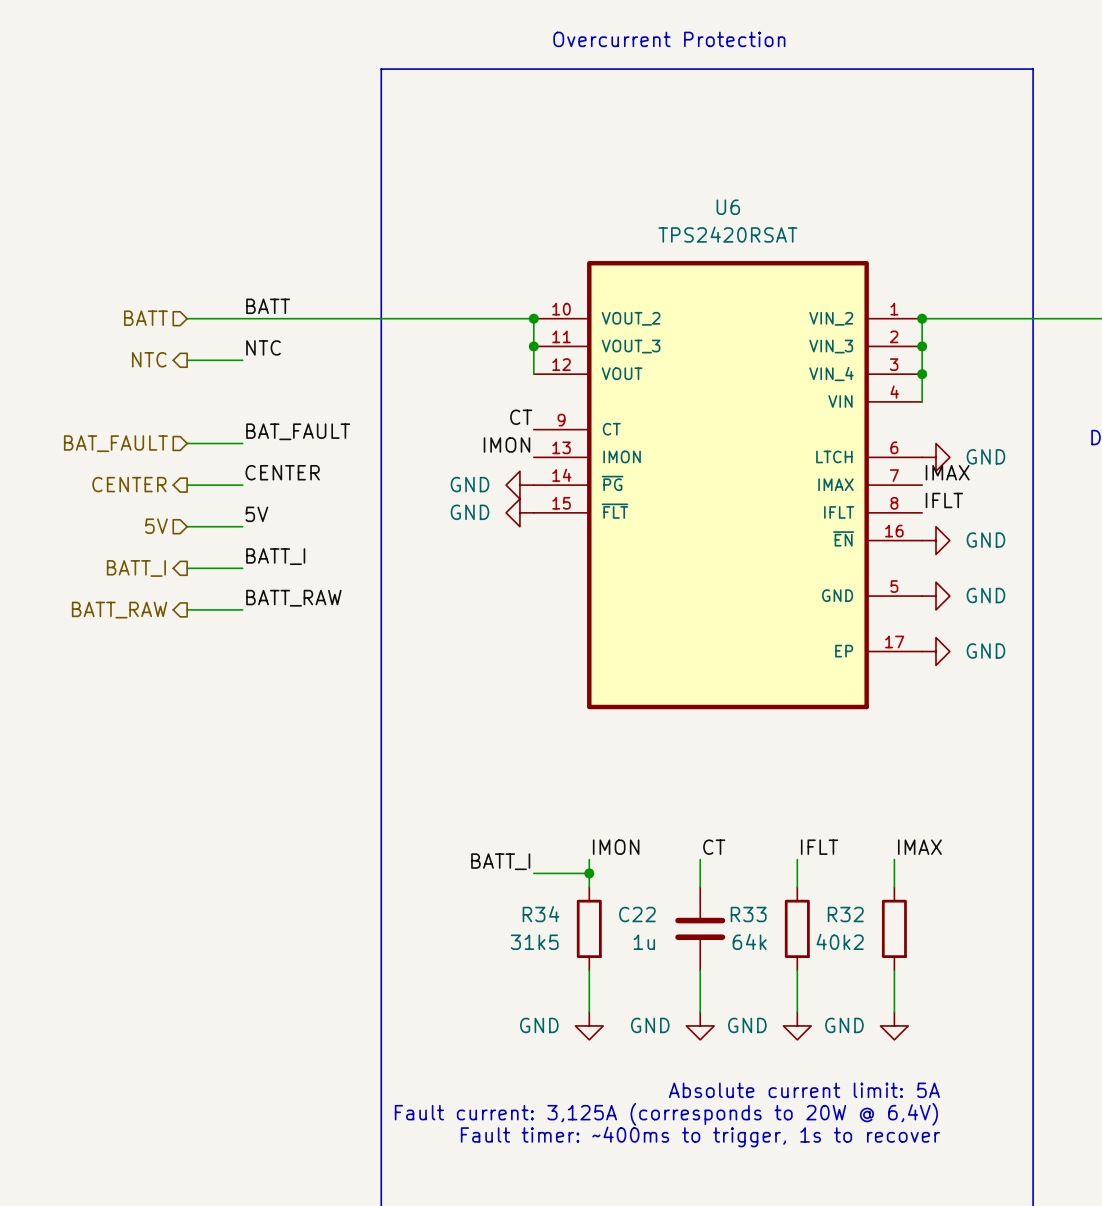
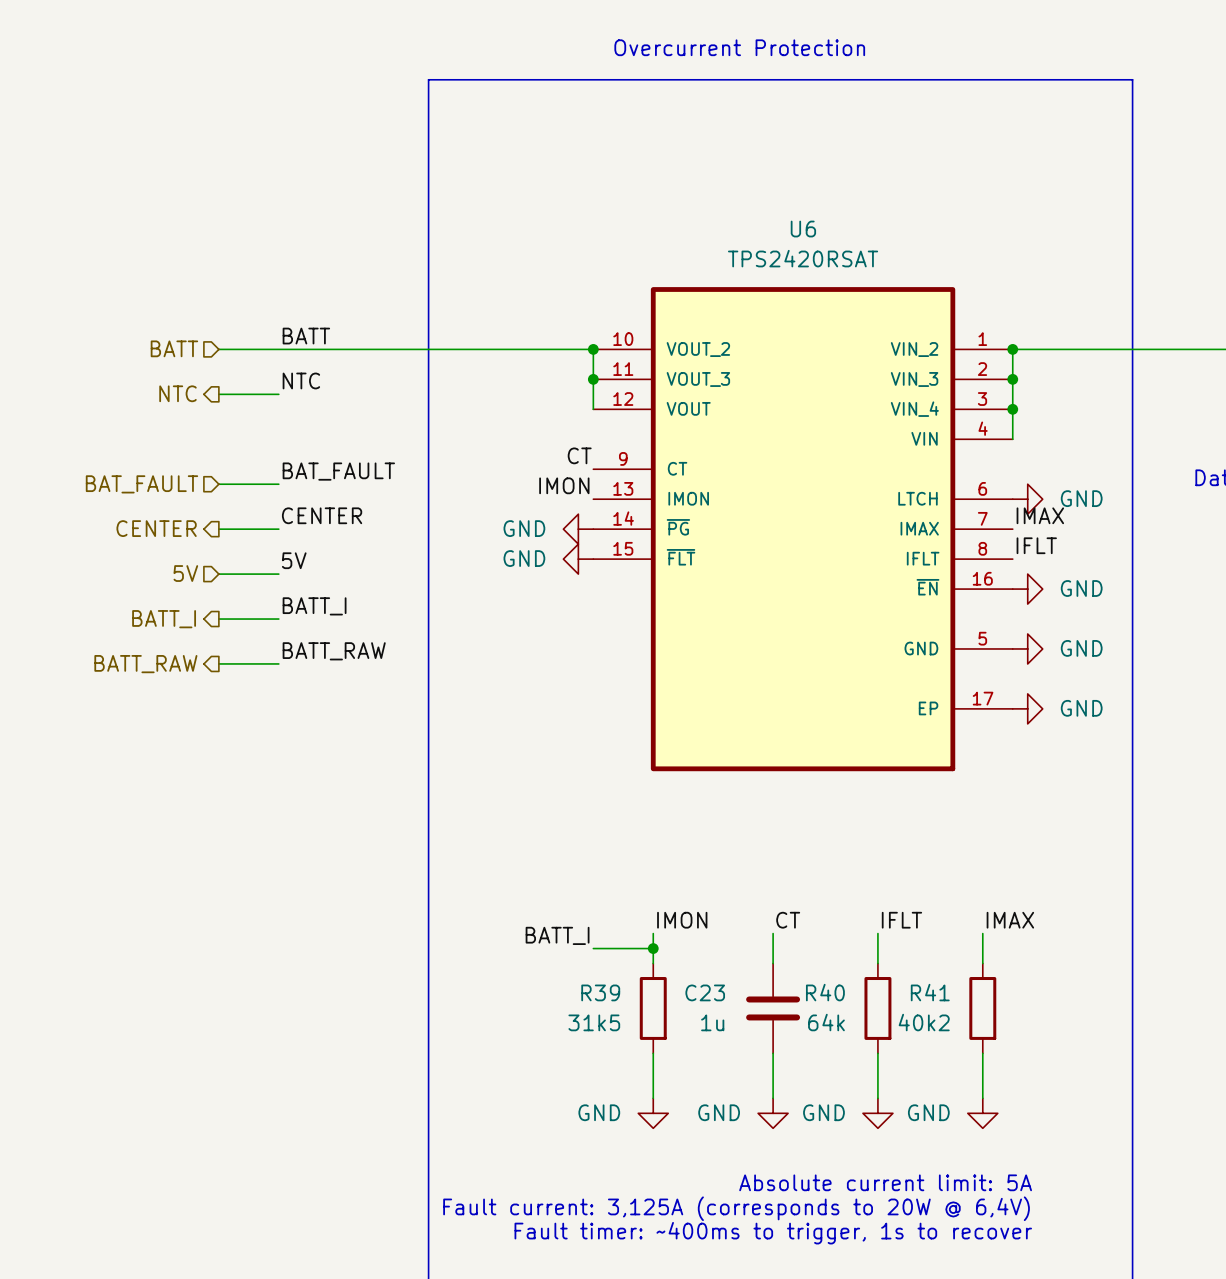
R34 name: R34 (540, 914) -> R39 (600, 992)
C22 name: C22 (637, 914) -> C23 (705, 992)
R33 name: R33 (748, 914) -> R40 (825, 992)
R32 name: R32 (845, 914) -> R41 (930, 992)

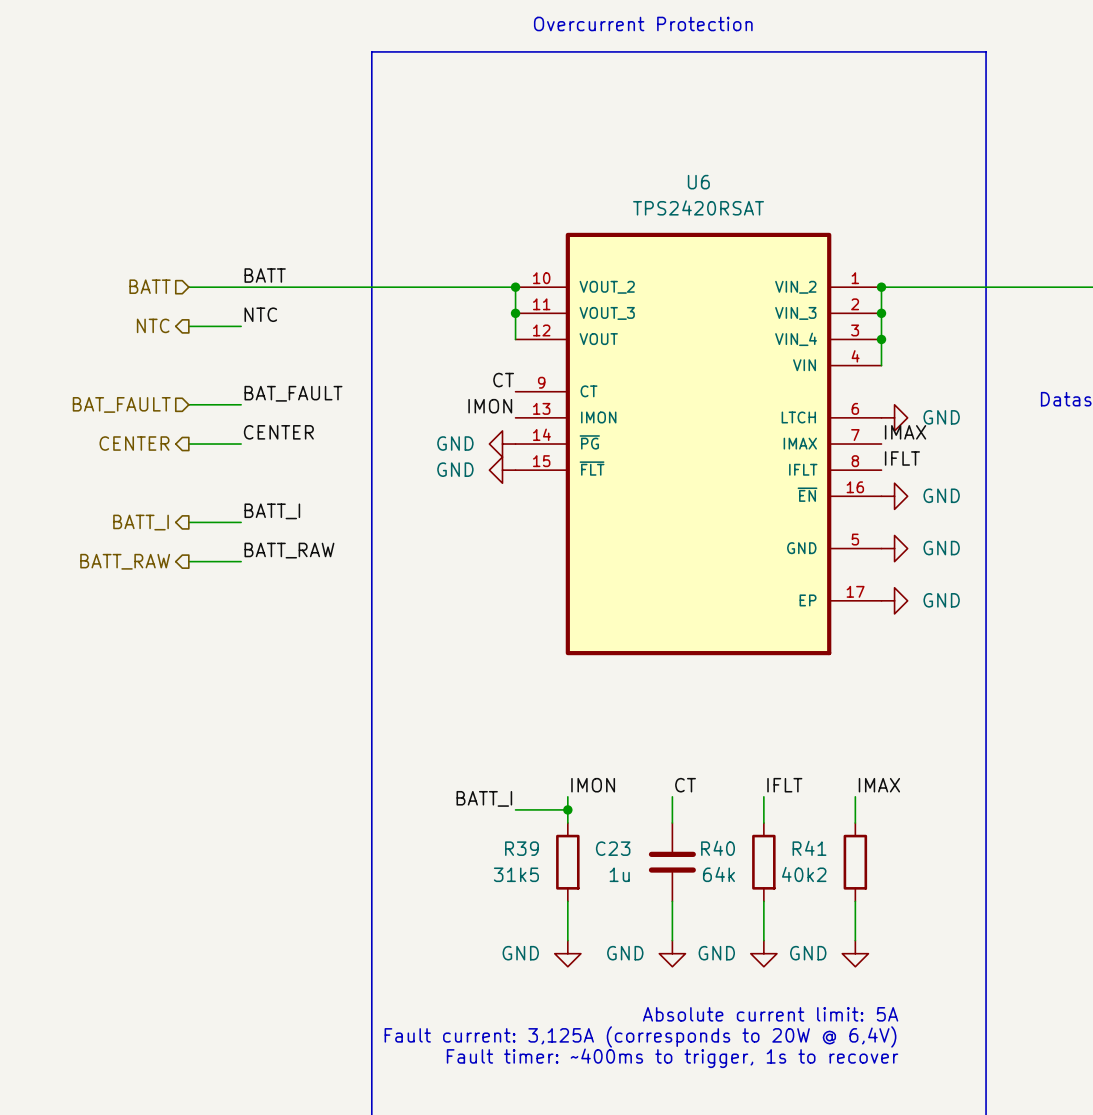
label: 5V (294, 560) -> none
hierarchical label: 5V (185, 573) -> none
wire: (218, 574) (278, 574) -> none

